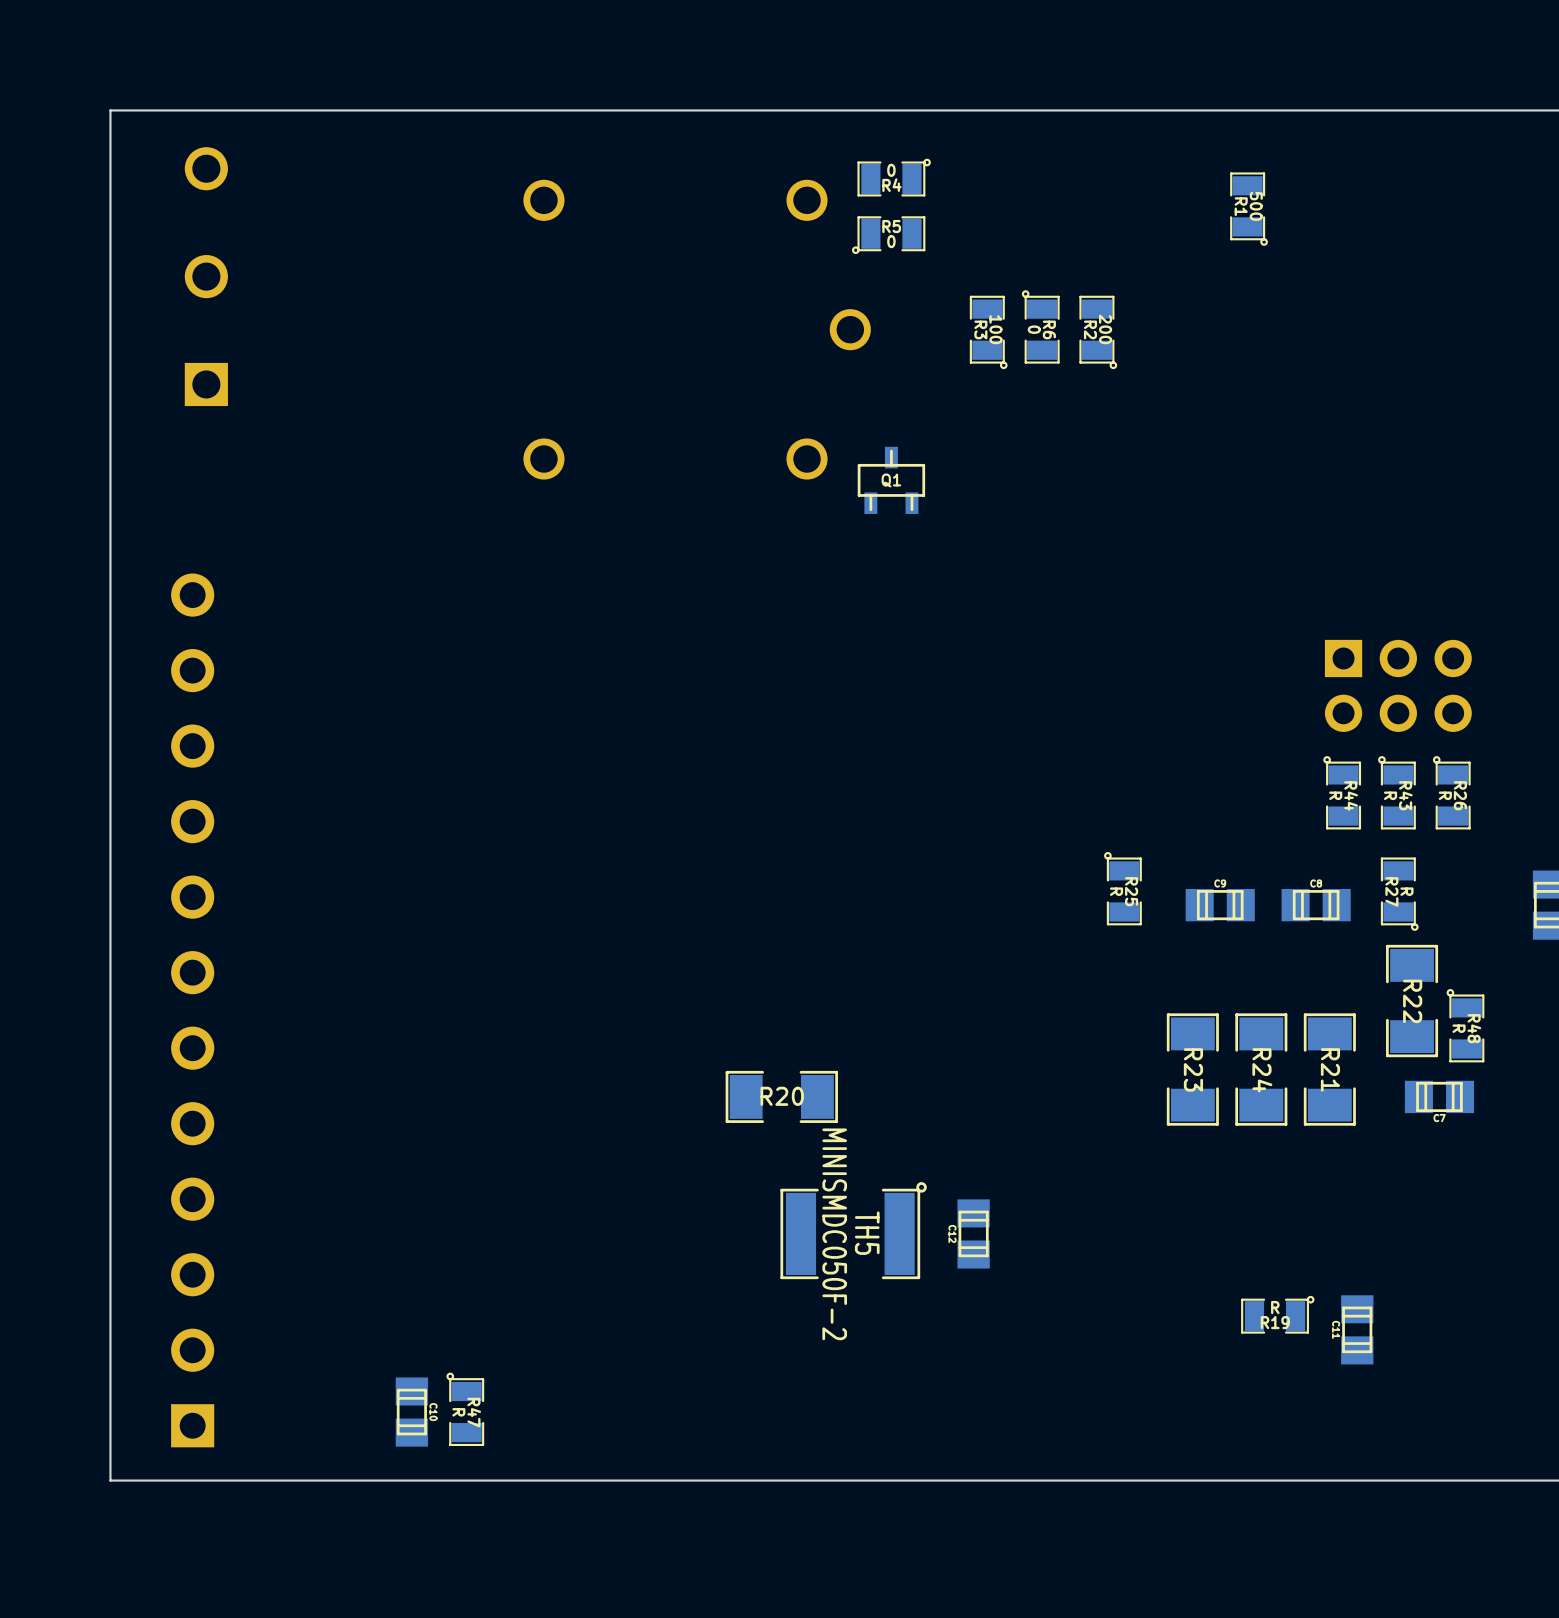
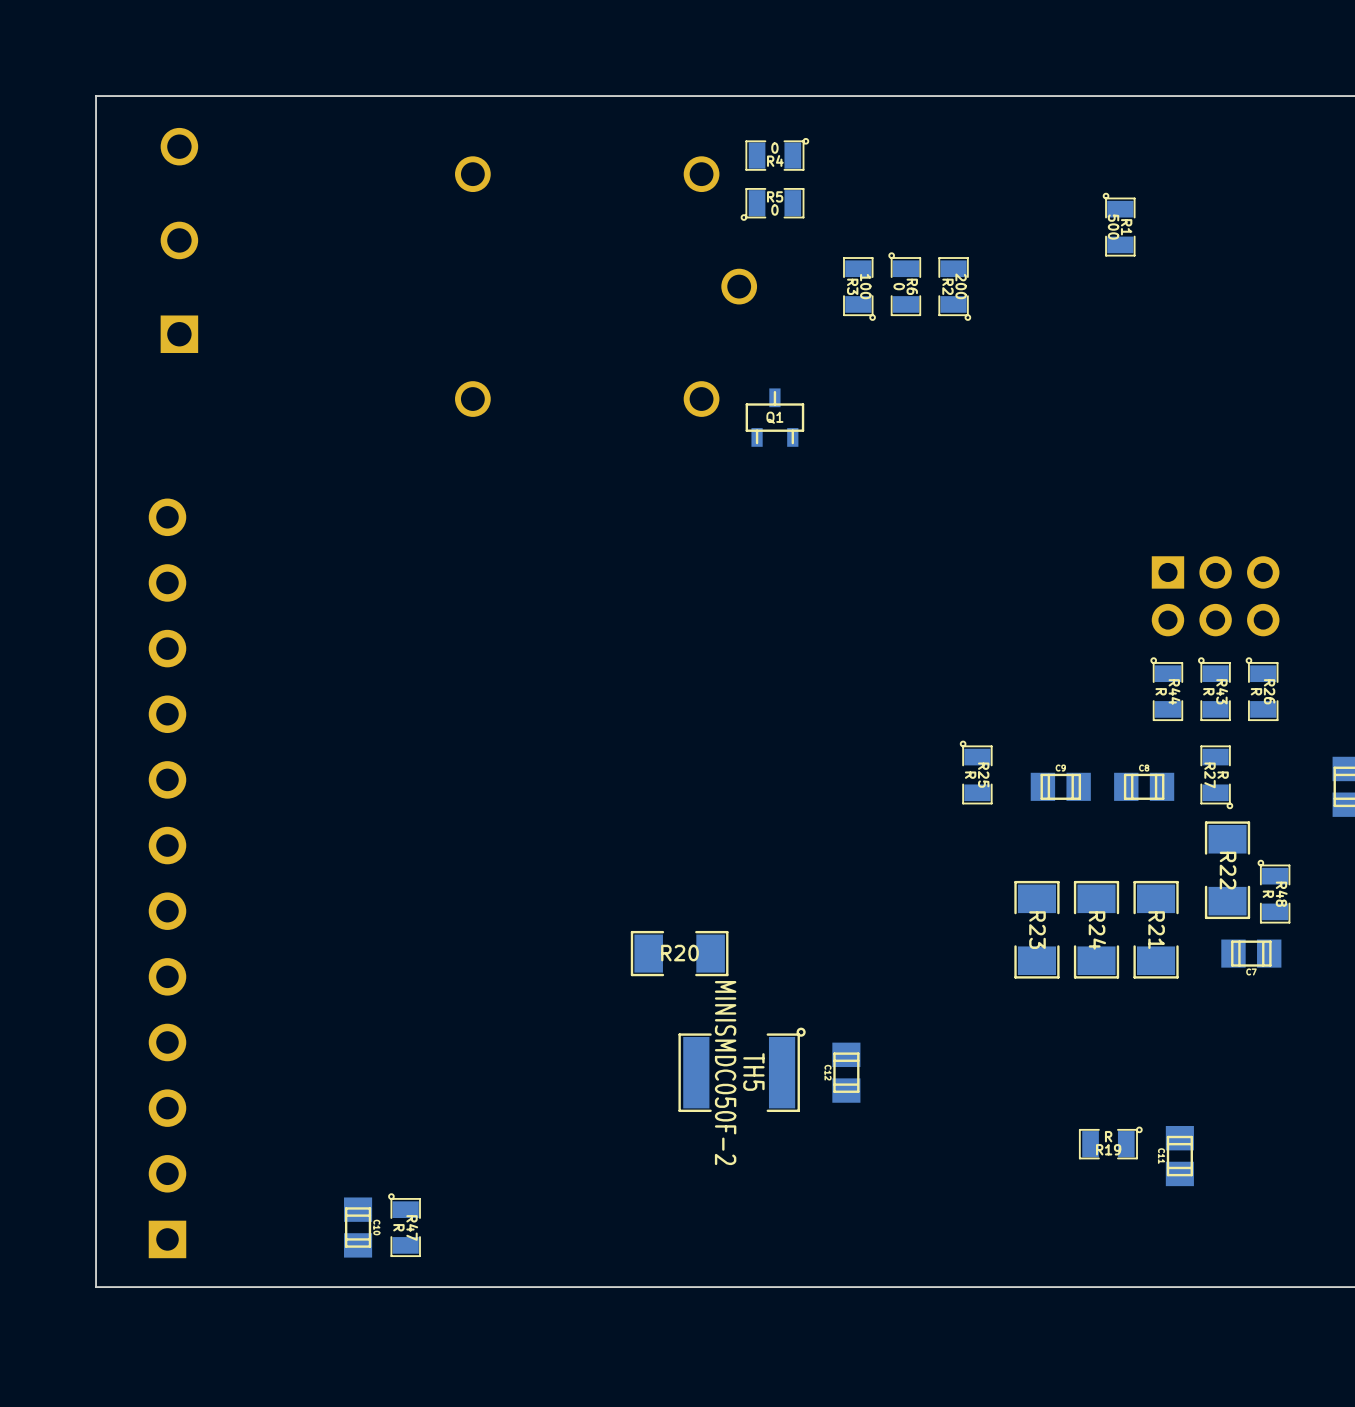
R1 rotation: 0° (1249, 209) -> 180° (1119, 224)
R1 position: (1249, 209) -> (1119, 224)

